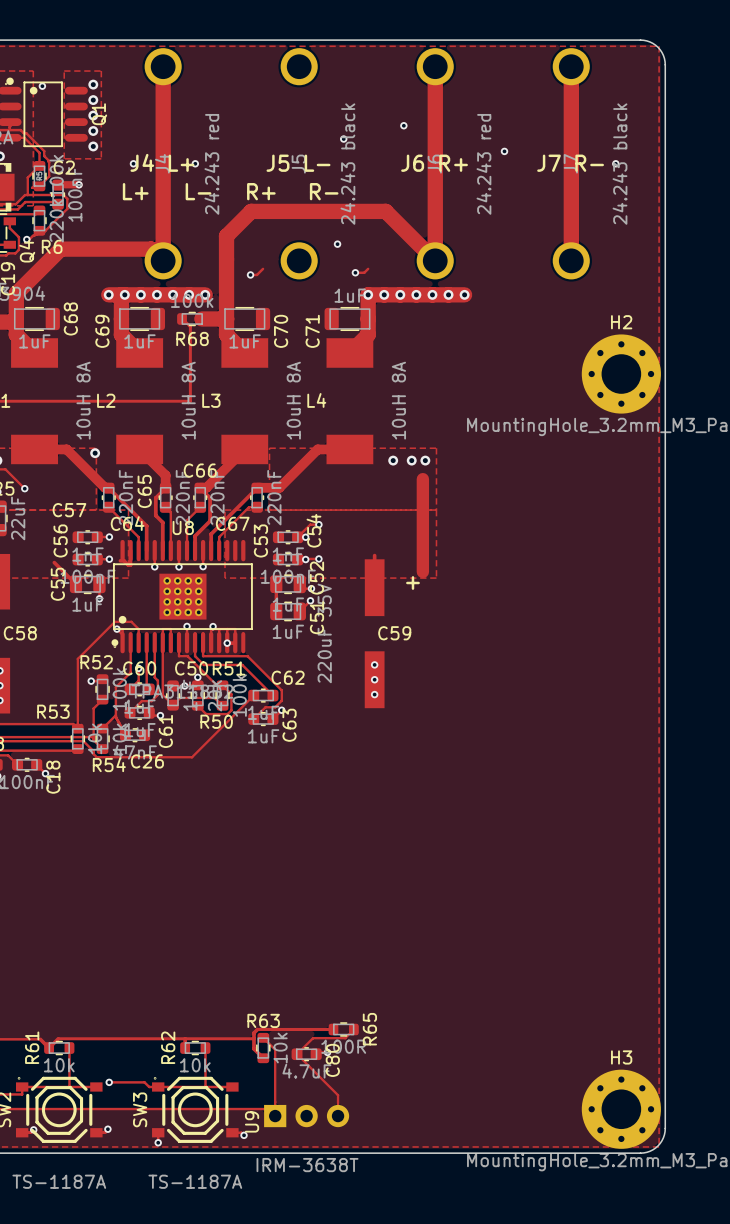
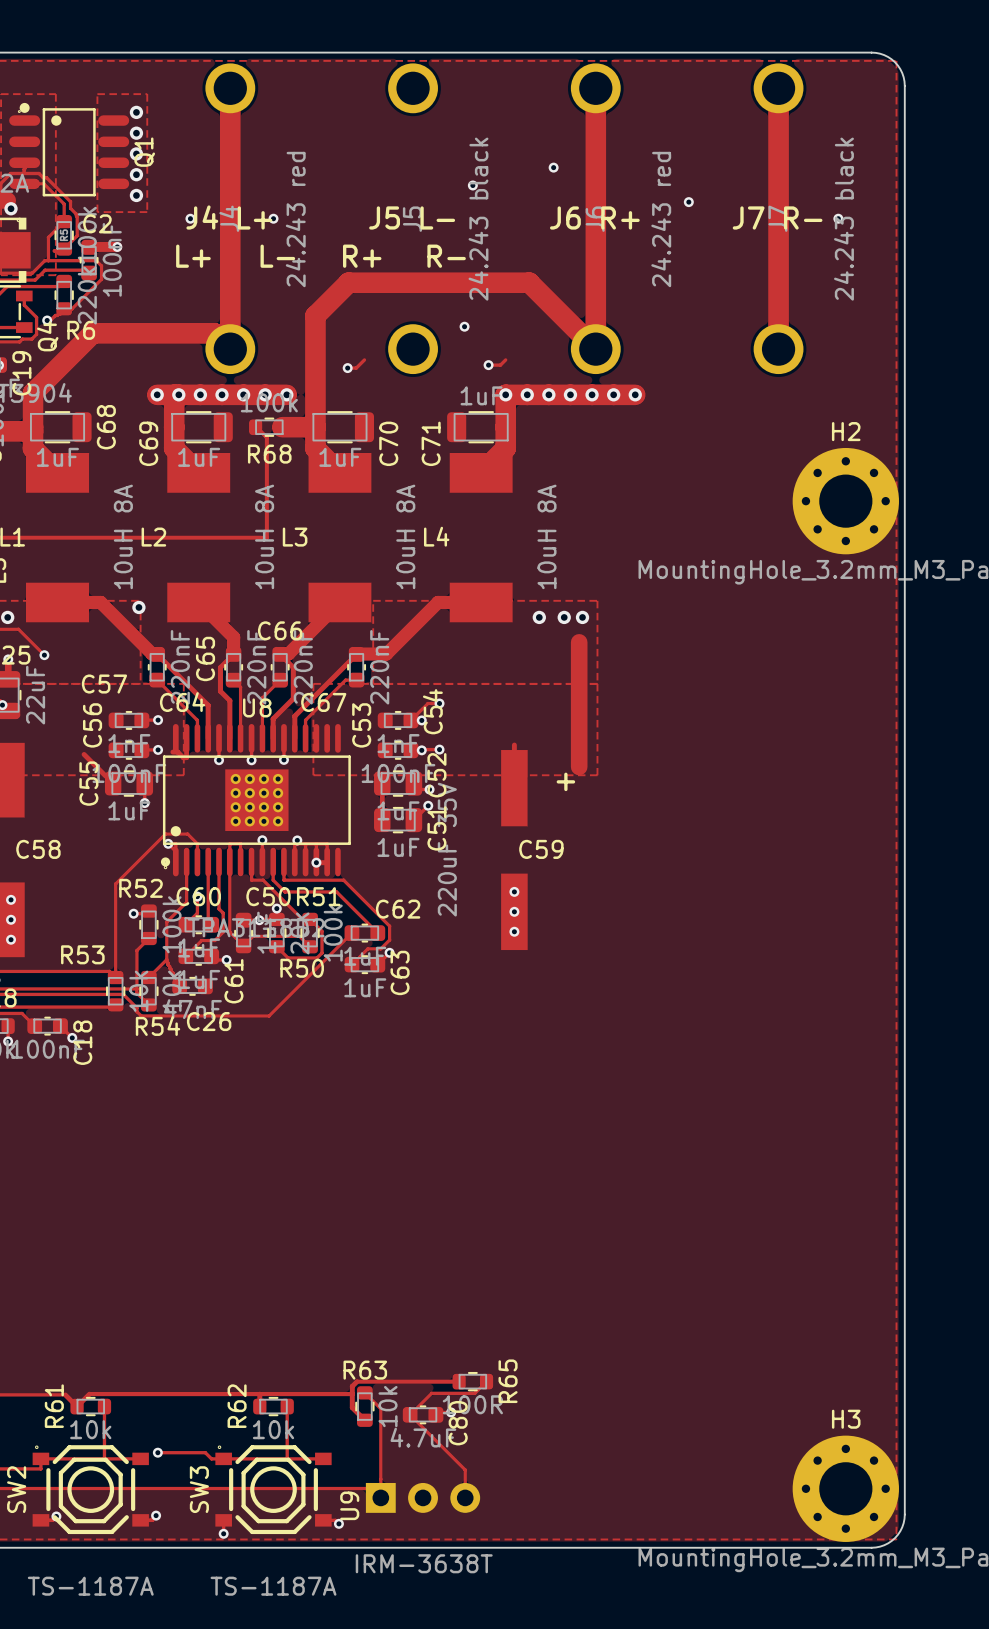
via: (42, 86) -> none

